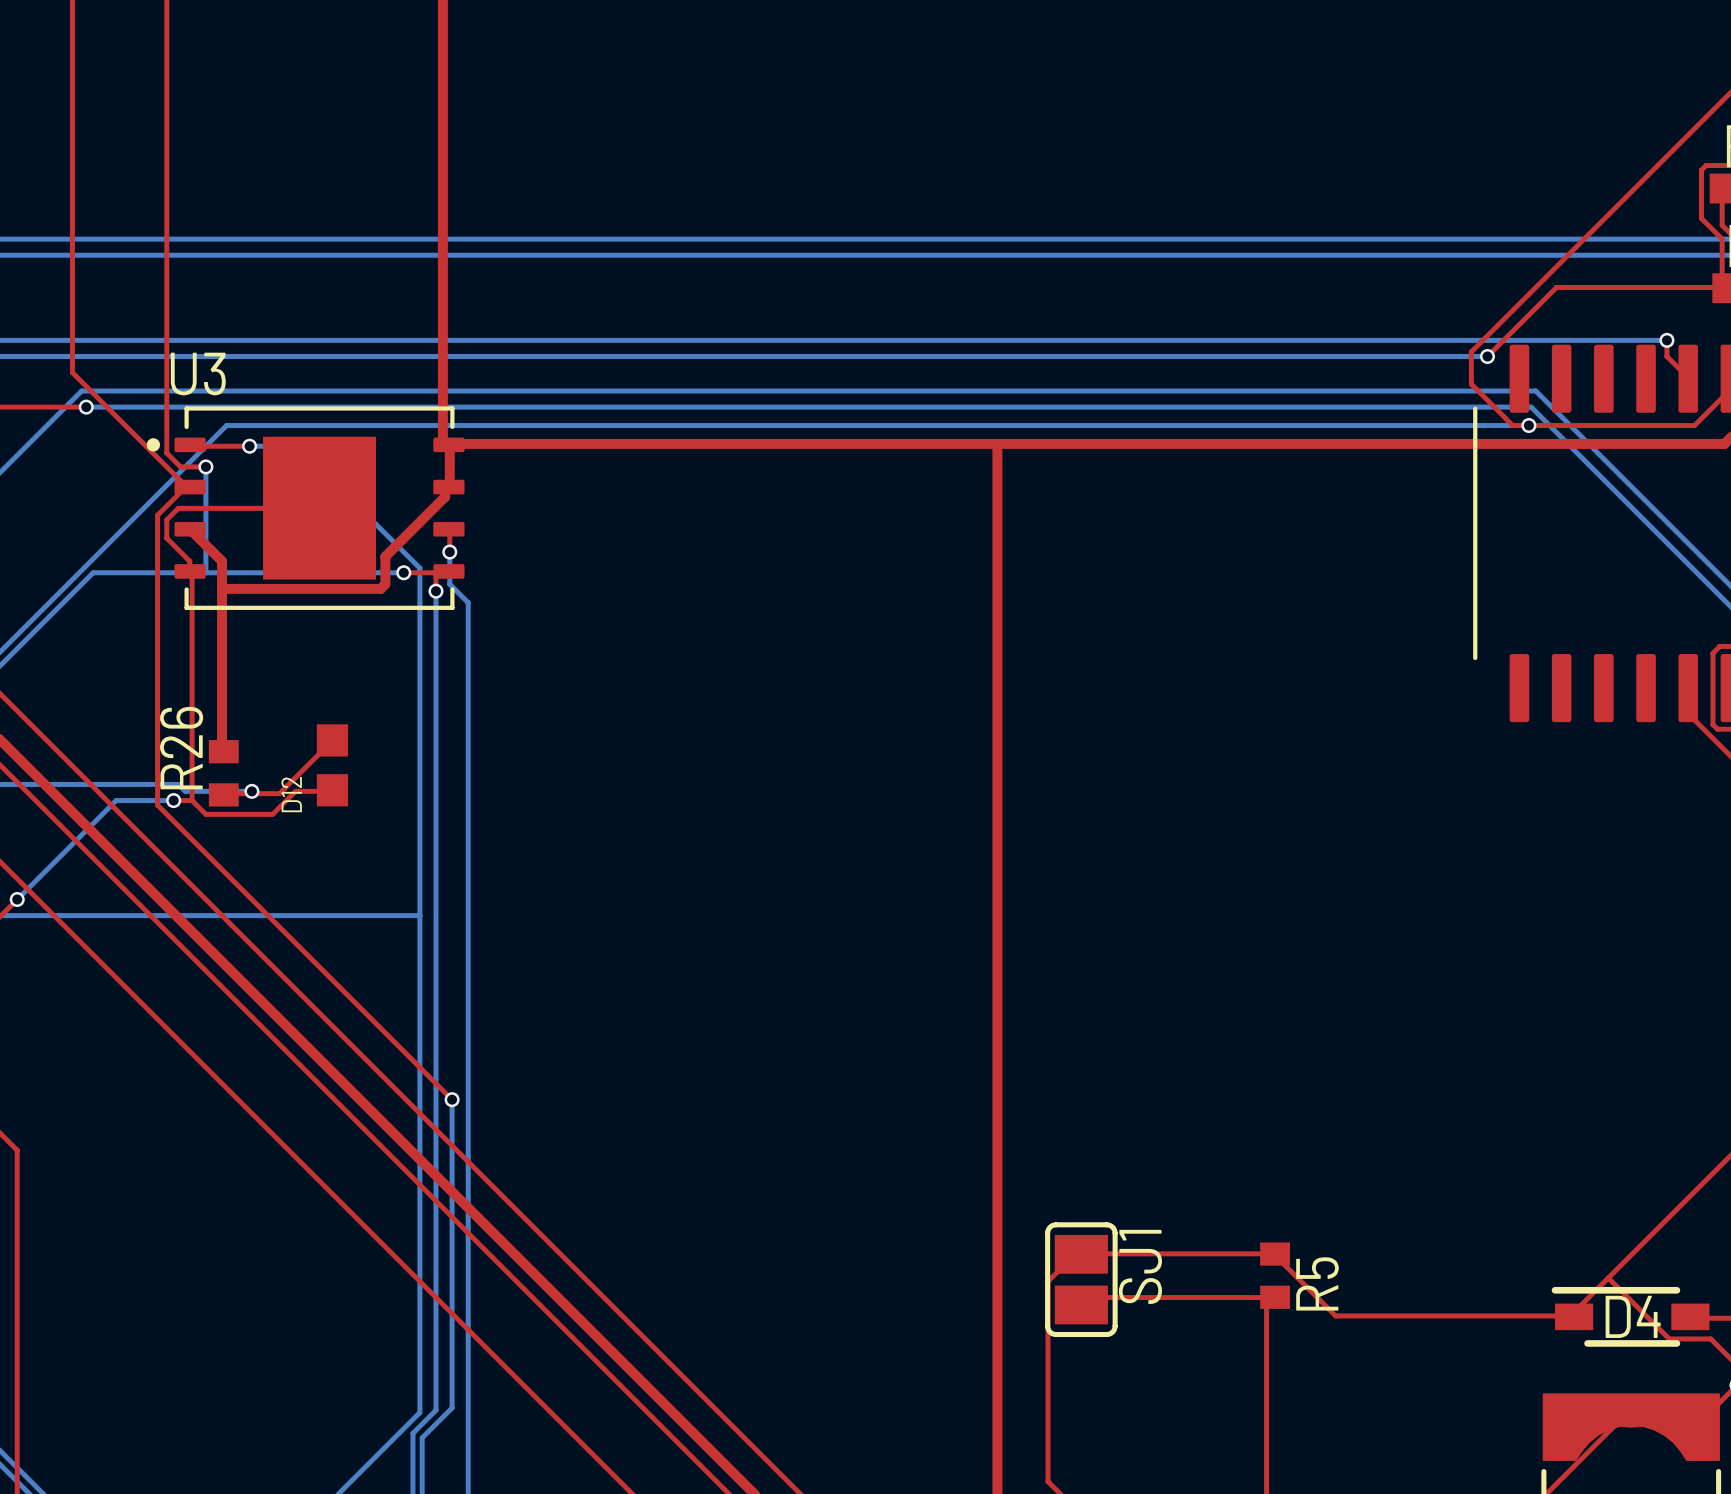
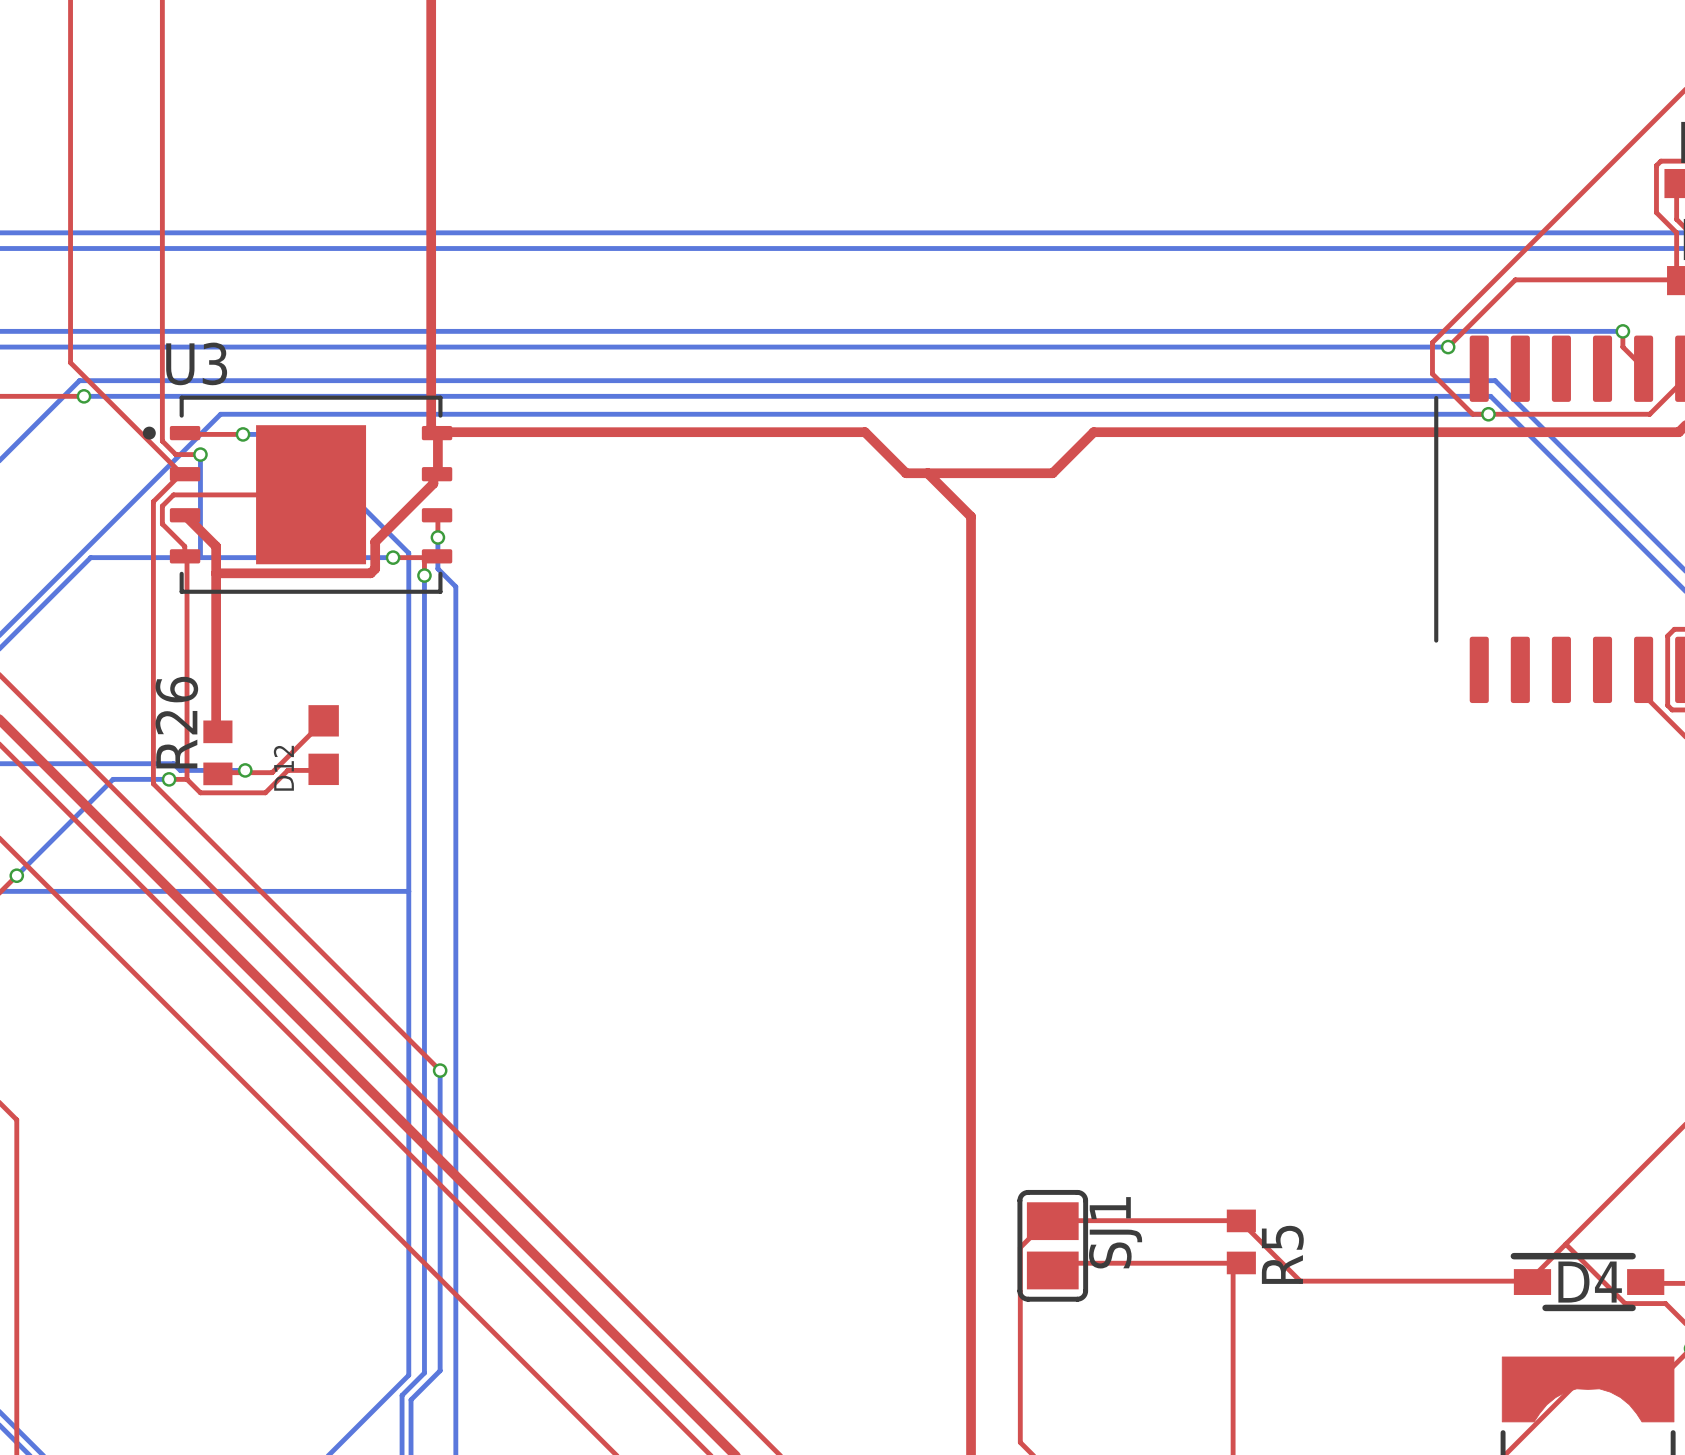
top track: (888, 443) (1123, 443) -> (865, 432) (906, 473) (1052, 473) (1093, 432)
top track: (997, 443) (997, 530) -> (927, 473) (971, 516)

